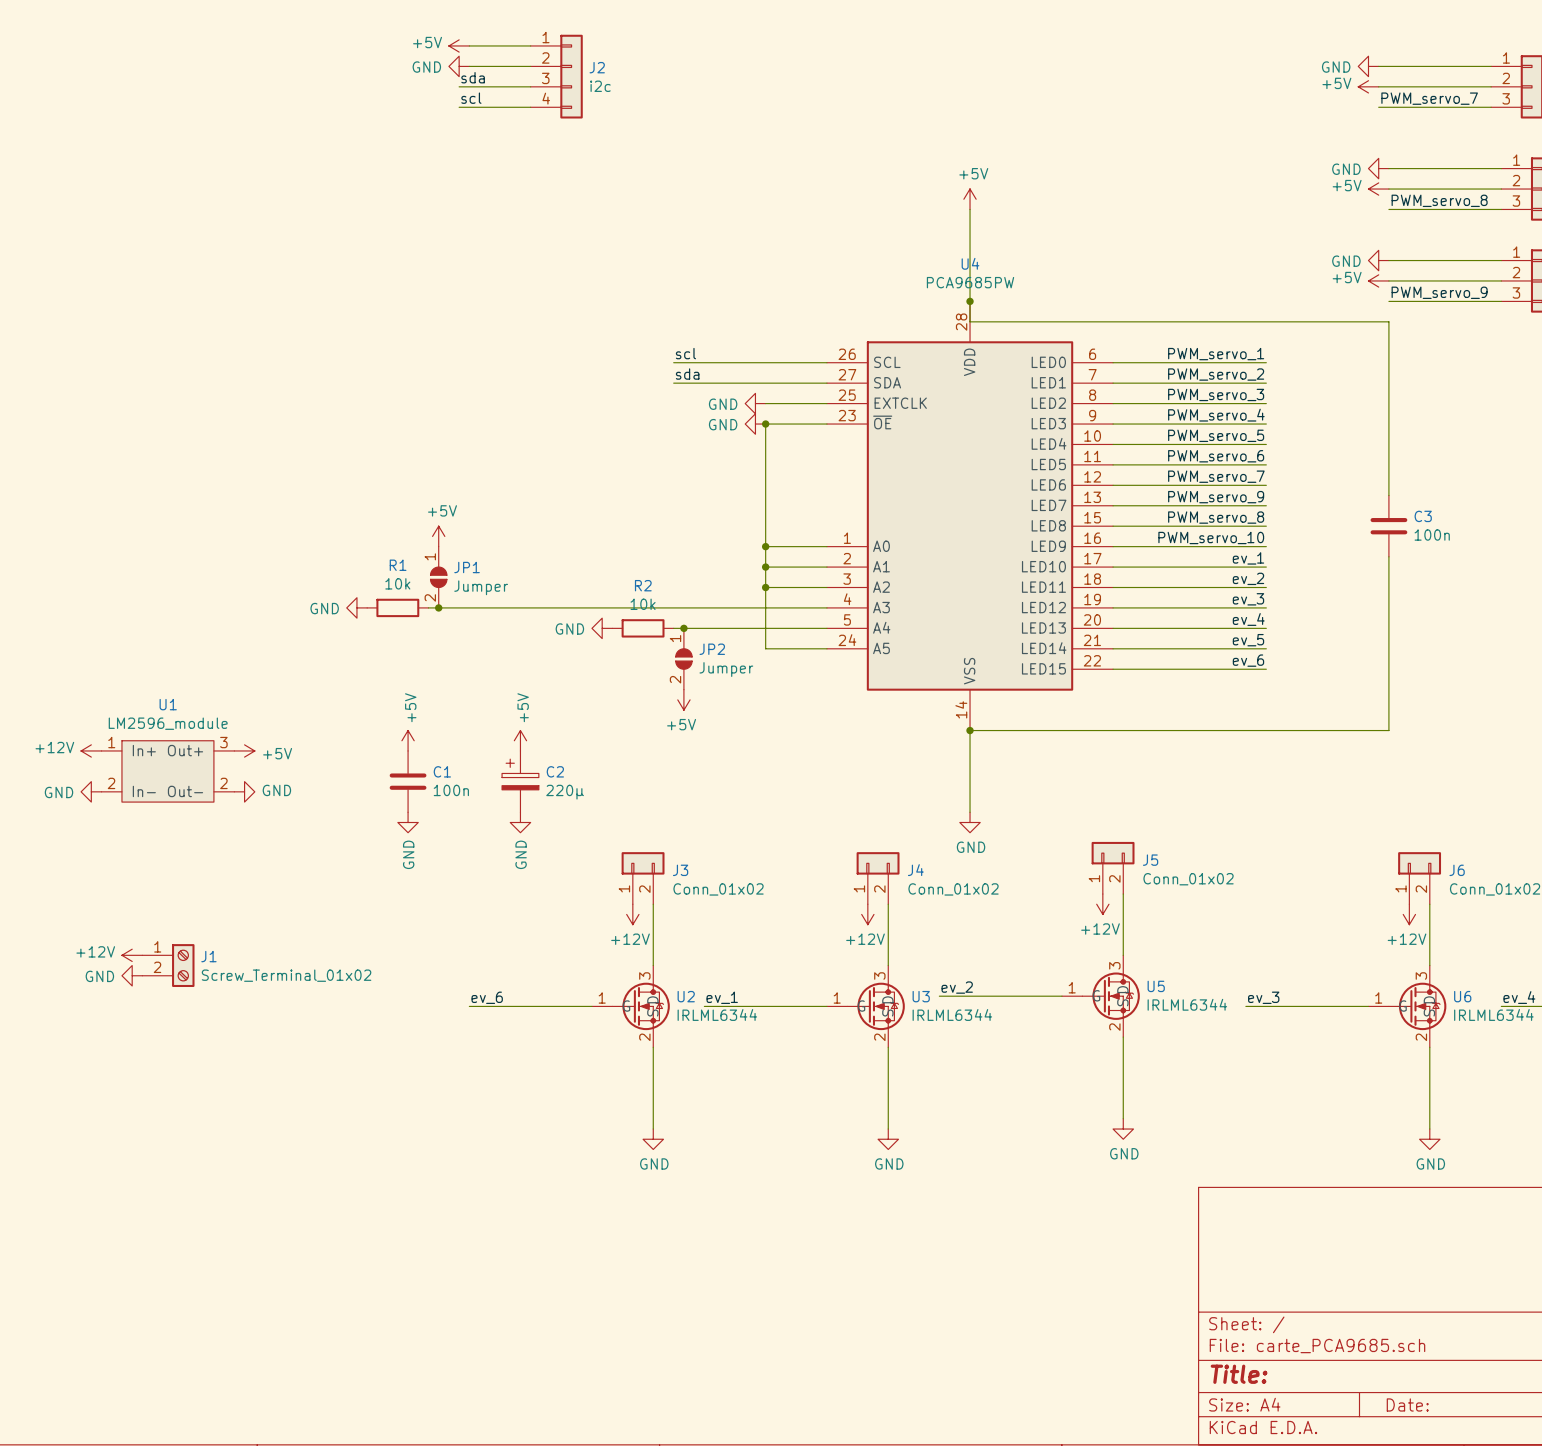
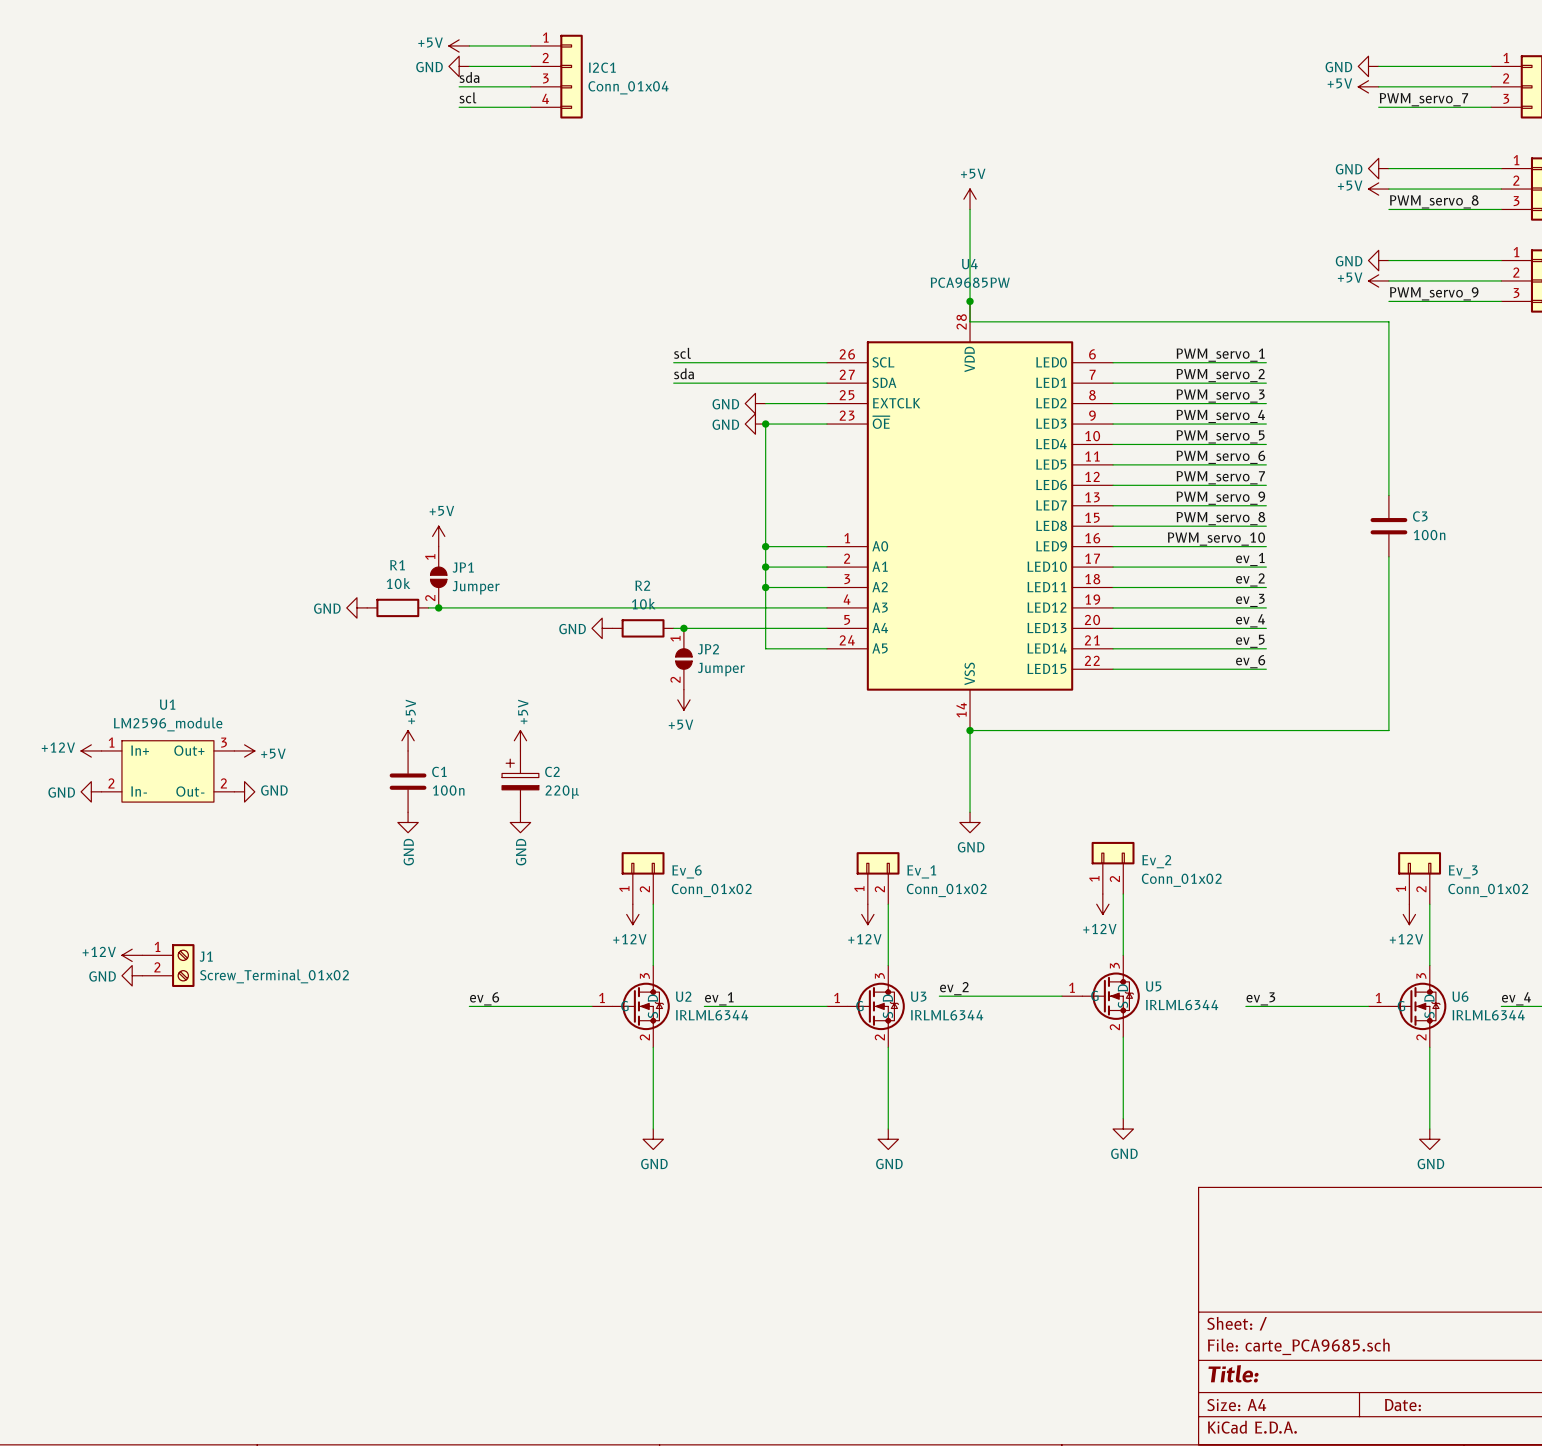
J2 name: J2 (597, 67) -> I2C1 (602, 67)
J2 value: i2c (600, 86) -> Conn_01x04 (628, 87)
J5 name: J5 (1150, 860) -> Ev_2 (1156, 861)
J3 name: J3 (680, 870) -> Ev_6 (687, 871)
J4 name: J4 (915, 870) -> Ev_1 (921, 871)
J6 name: J6 (1457, 870) -> Ev_3 (1463, 871)

